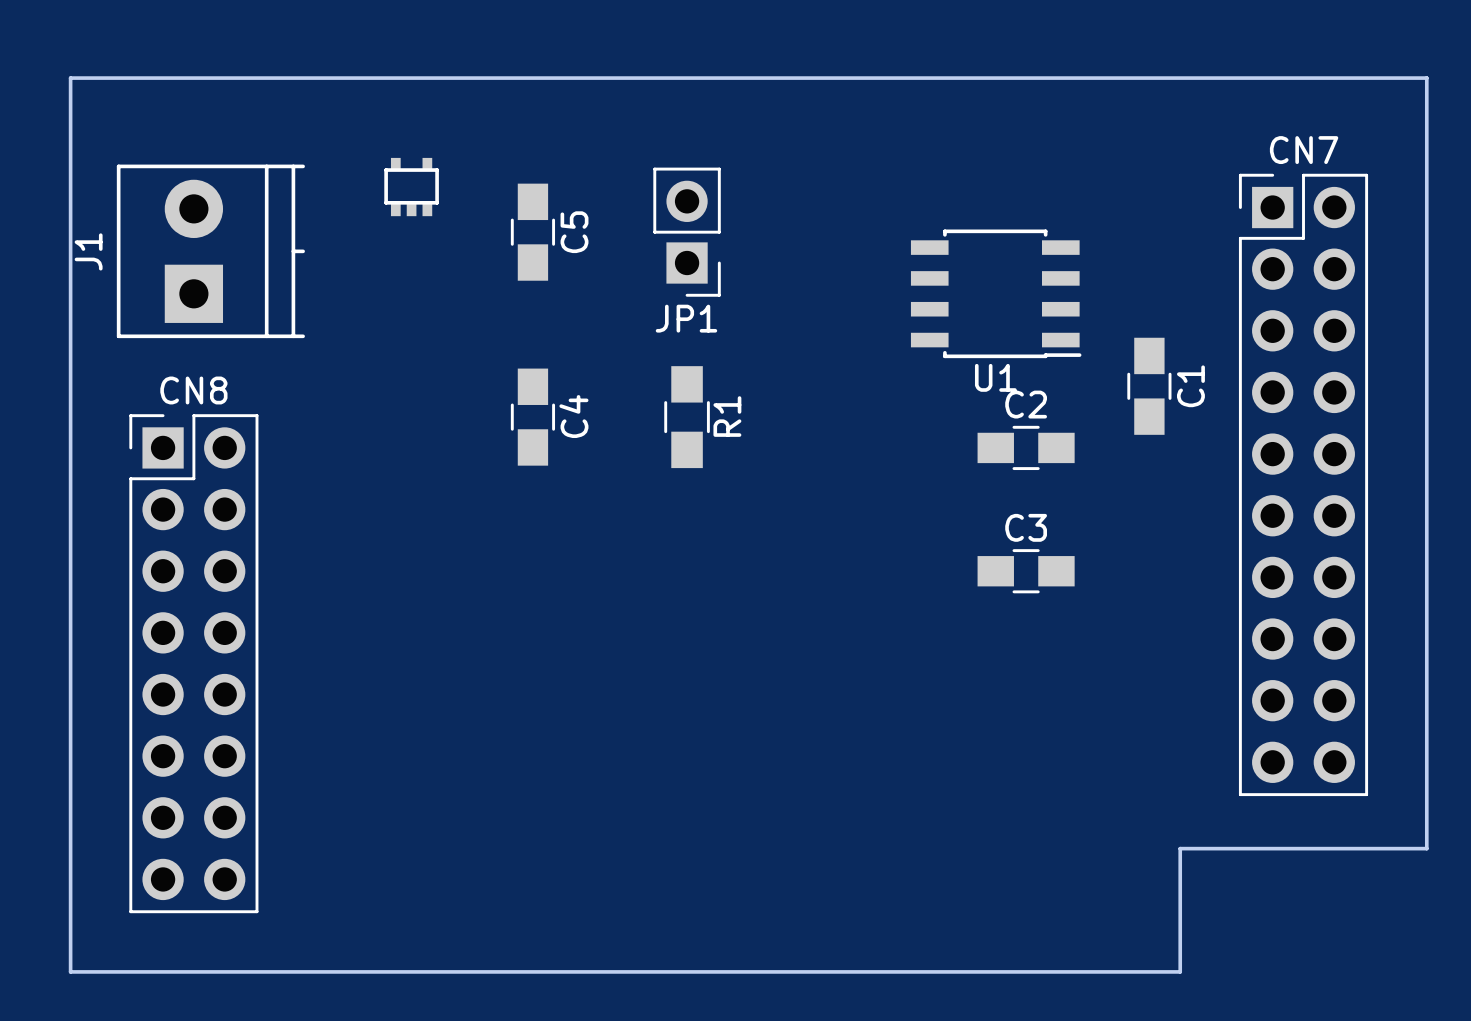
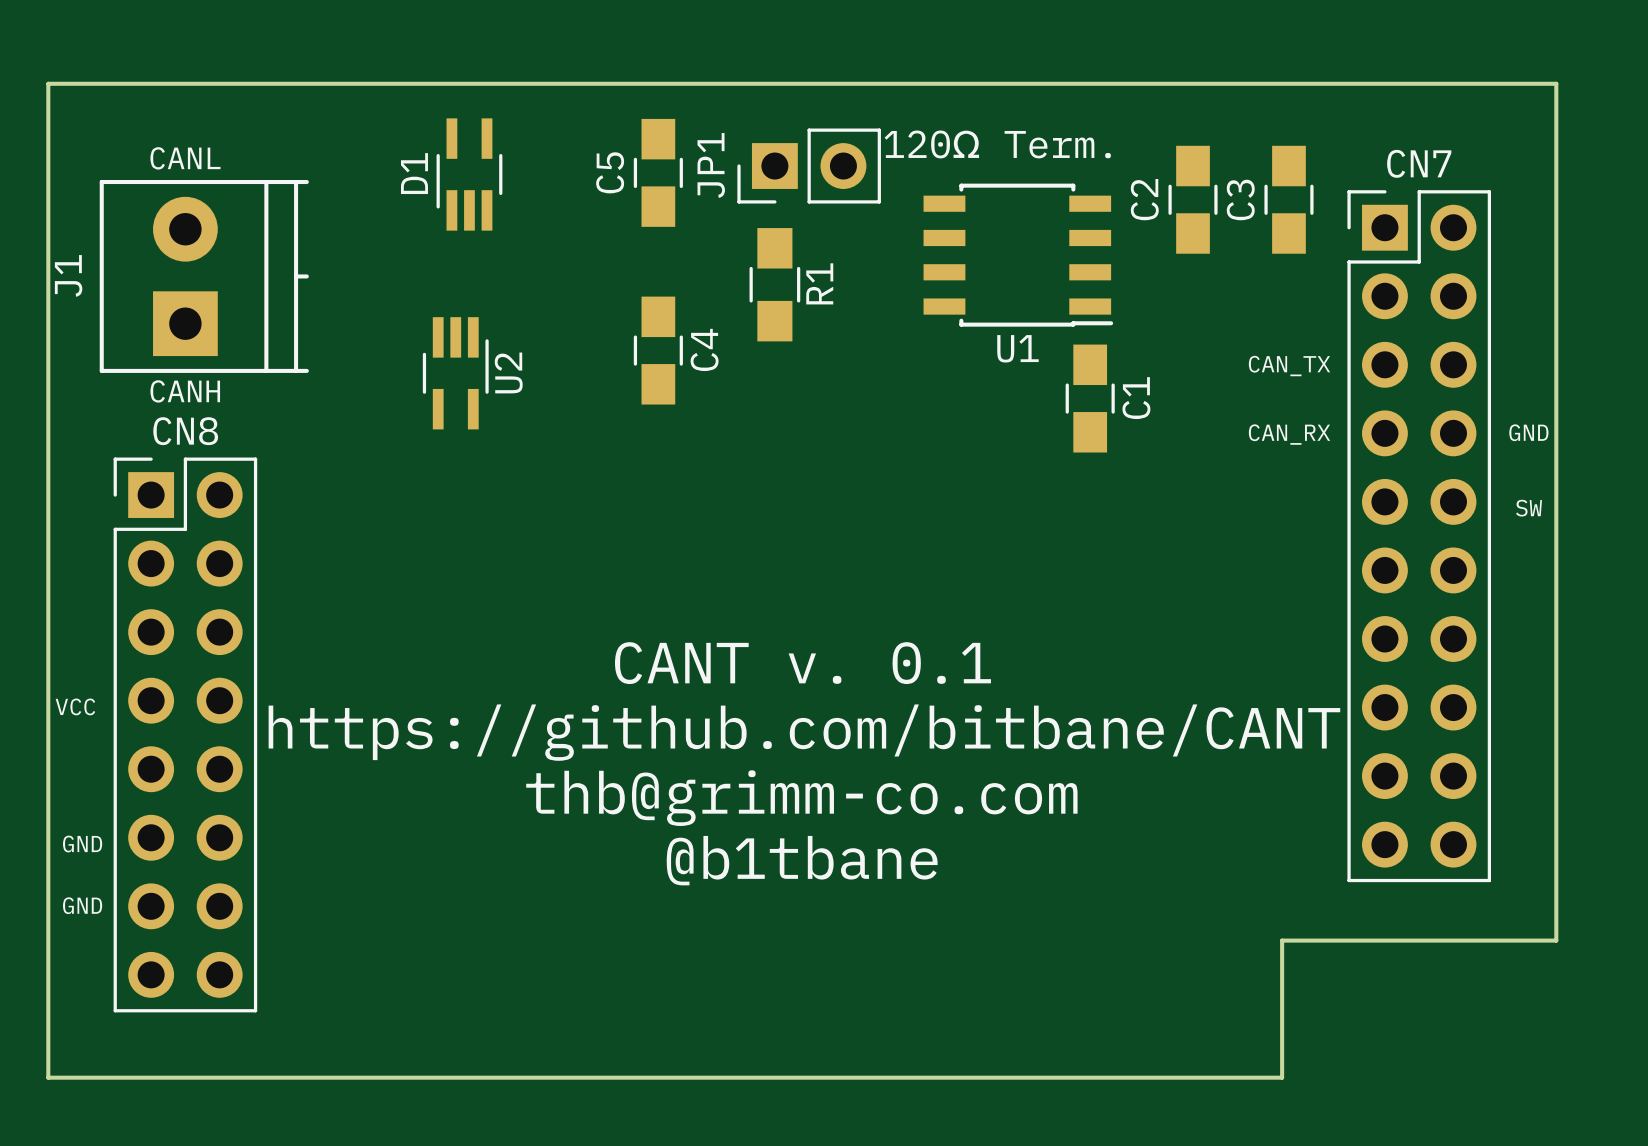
text: none -> 120Ω Term. (997, 144)
text: none -> CANL (185, 158)
D1: none -> (469, 174)
part: (411, 187) -> none
C5 position: (532, 232) -> (658, 172)
C5 name position: C5 (574, 232) -> C5 (610, 172)
JP1 rotation: 0° (687, 232) -> 90° clockwise (809, 166)
JP1 position: (687, 232) -> (809, 166)
U1 position: (996, 293) -> (1018, 255)
text: none -> CAN_TX (1289, 366)
U2: none -> (455, 373)
text: none -> CANH (185, 391)
C1 position: (1149, 386) -> (1090, 398)
text: none -> GND (1528, 432)
text: none -> CAN_RX (1289, 434)
C2 name position: C2 (1026, 404) -> C2 (1144, 199)
C4 position: (532, 417) -> (658, 350)
R1 position: (687, 417) -> (774, 284)
C2 rotation: 0° (1026, 447) -> 90° clockwise (1193, 199)
C2 position: (1026, 447) -> (1193, 199)
text: none -> SW (1529, 508)
C3 name position: C3 (1026, 527) -> C3 (1240, 199)
C3 rotation: 0° (1026, 571) -> 90° clockwise (1288, 199)
C3 position: (1026, 571) -> (1288, 199)
text: none -> CANT v. 0.1 (802, 663)
text: none -> VCC (75, 706)
text: none -> https://github.com/bitbane/CANT (804, 732)
text: none -> thb@grimm-co.com (801, 798)
text: none -> GND (82, 844)
text: none -> @b1tbane (802, 860)
text: none -> GND (82, 905)

